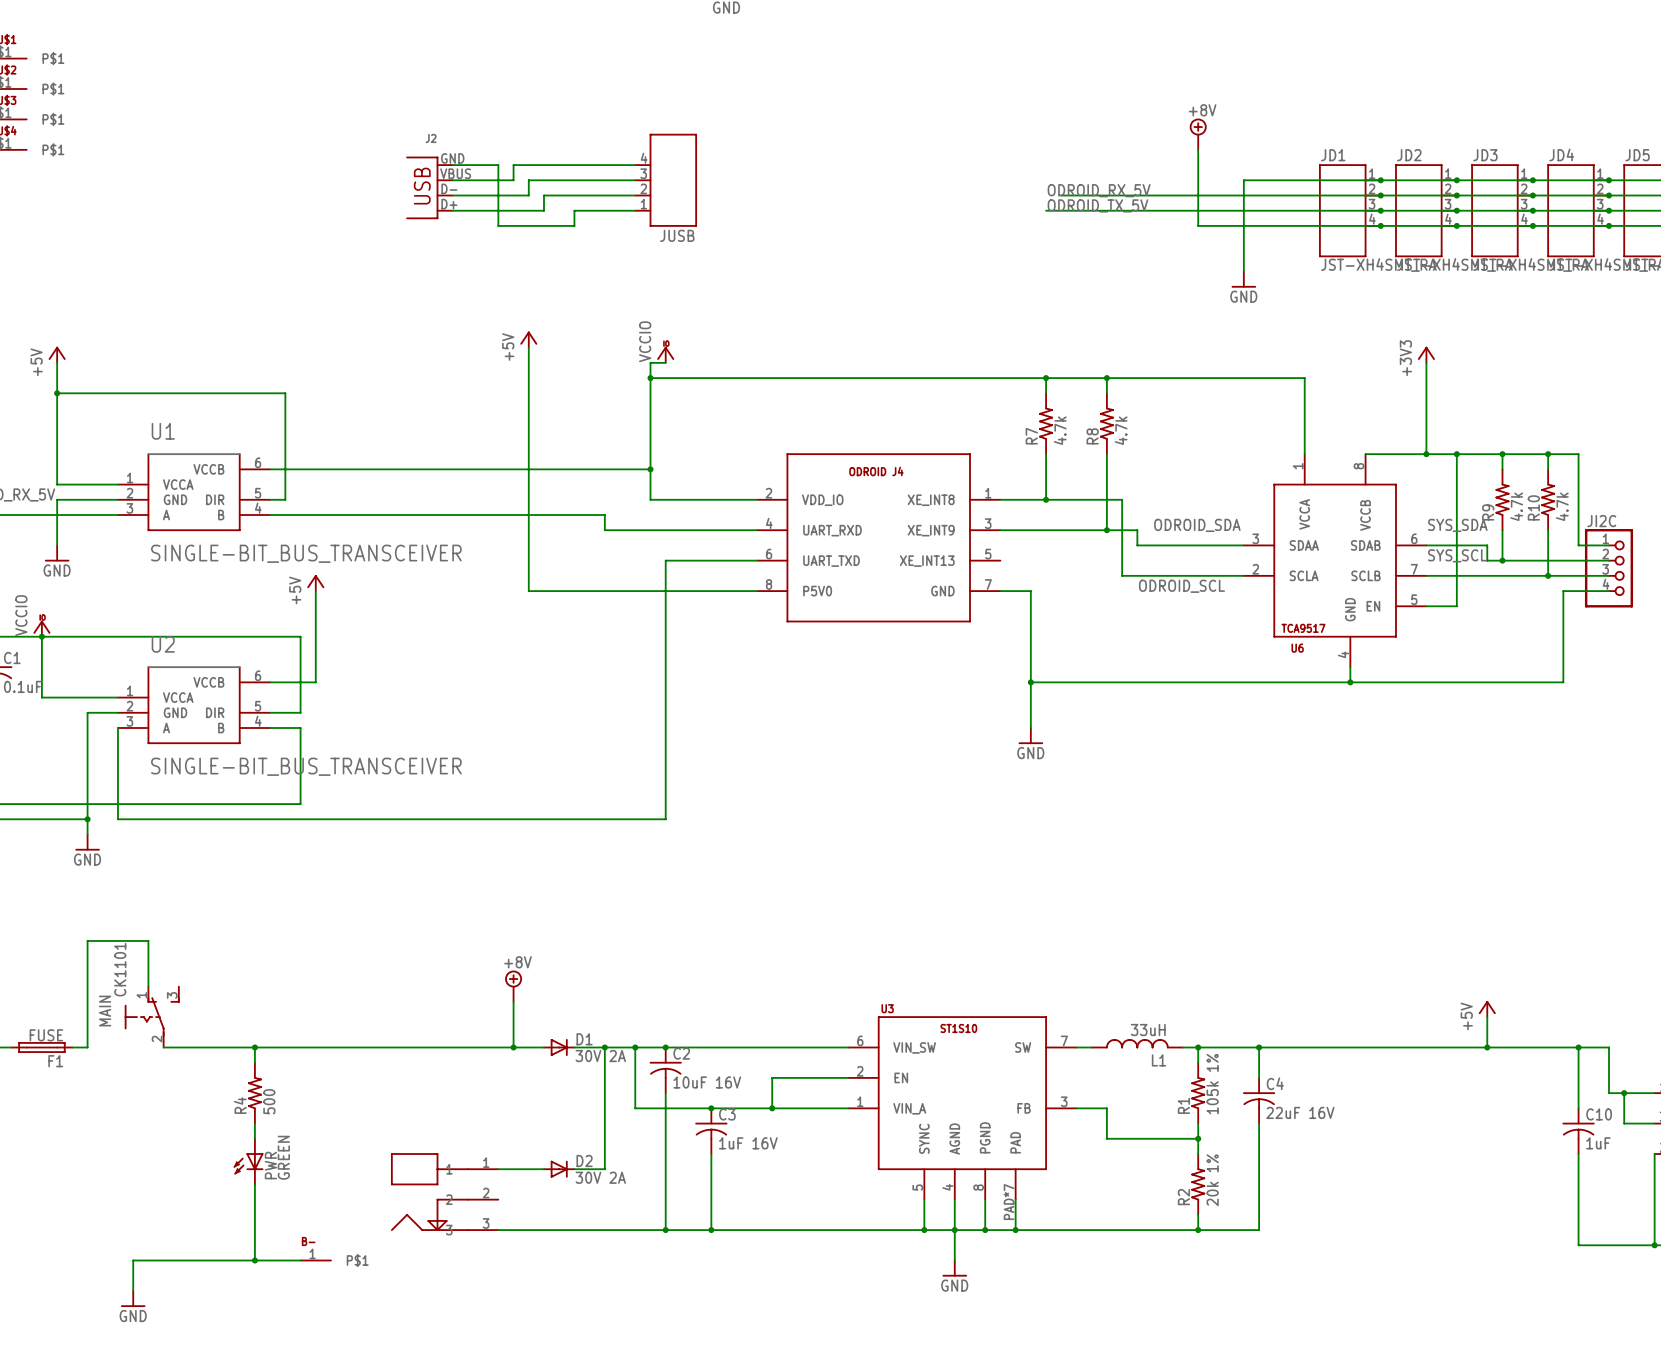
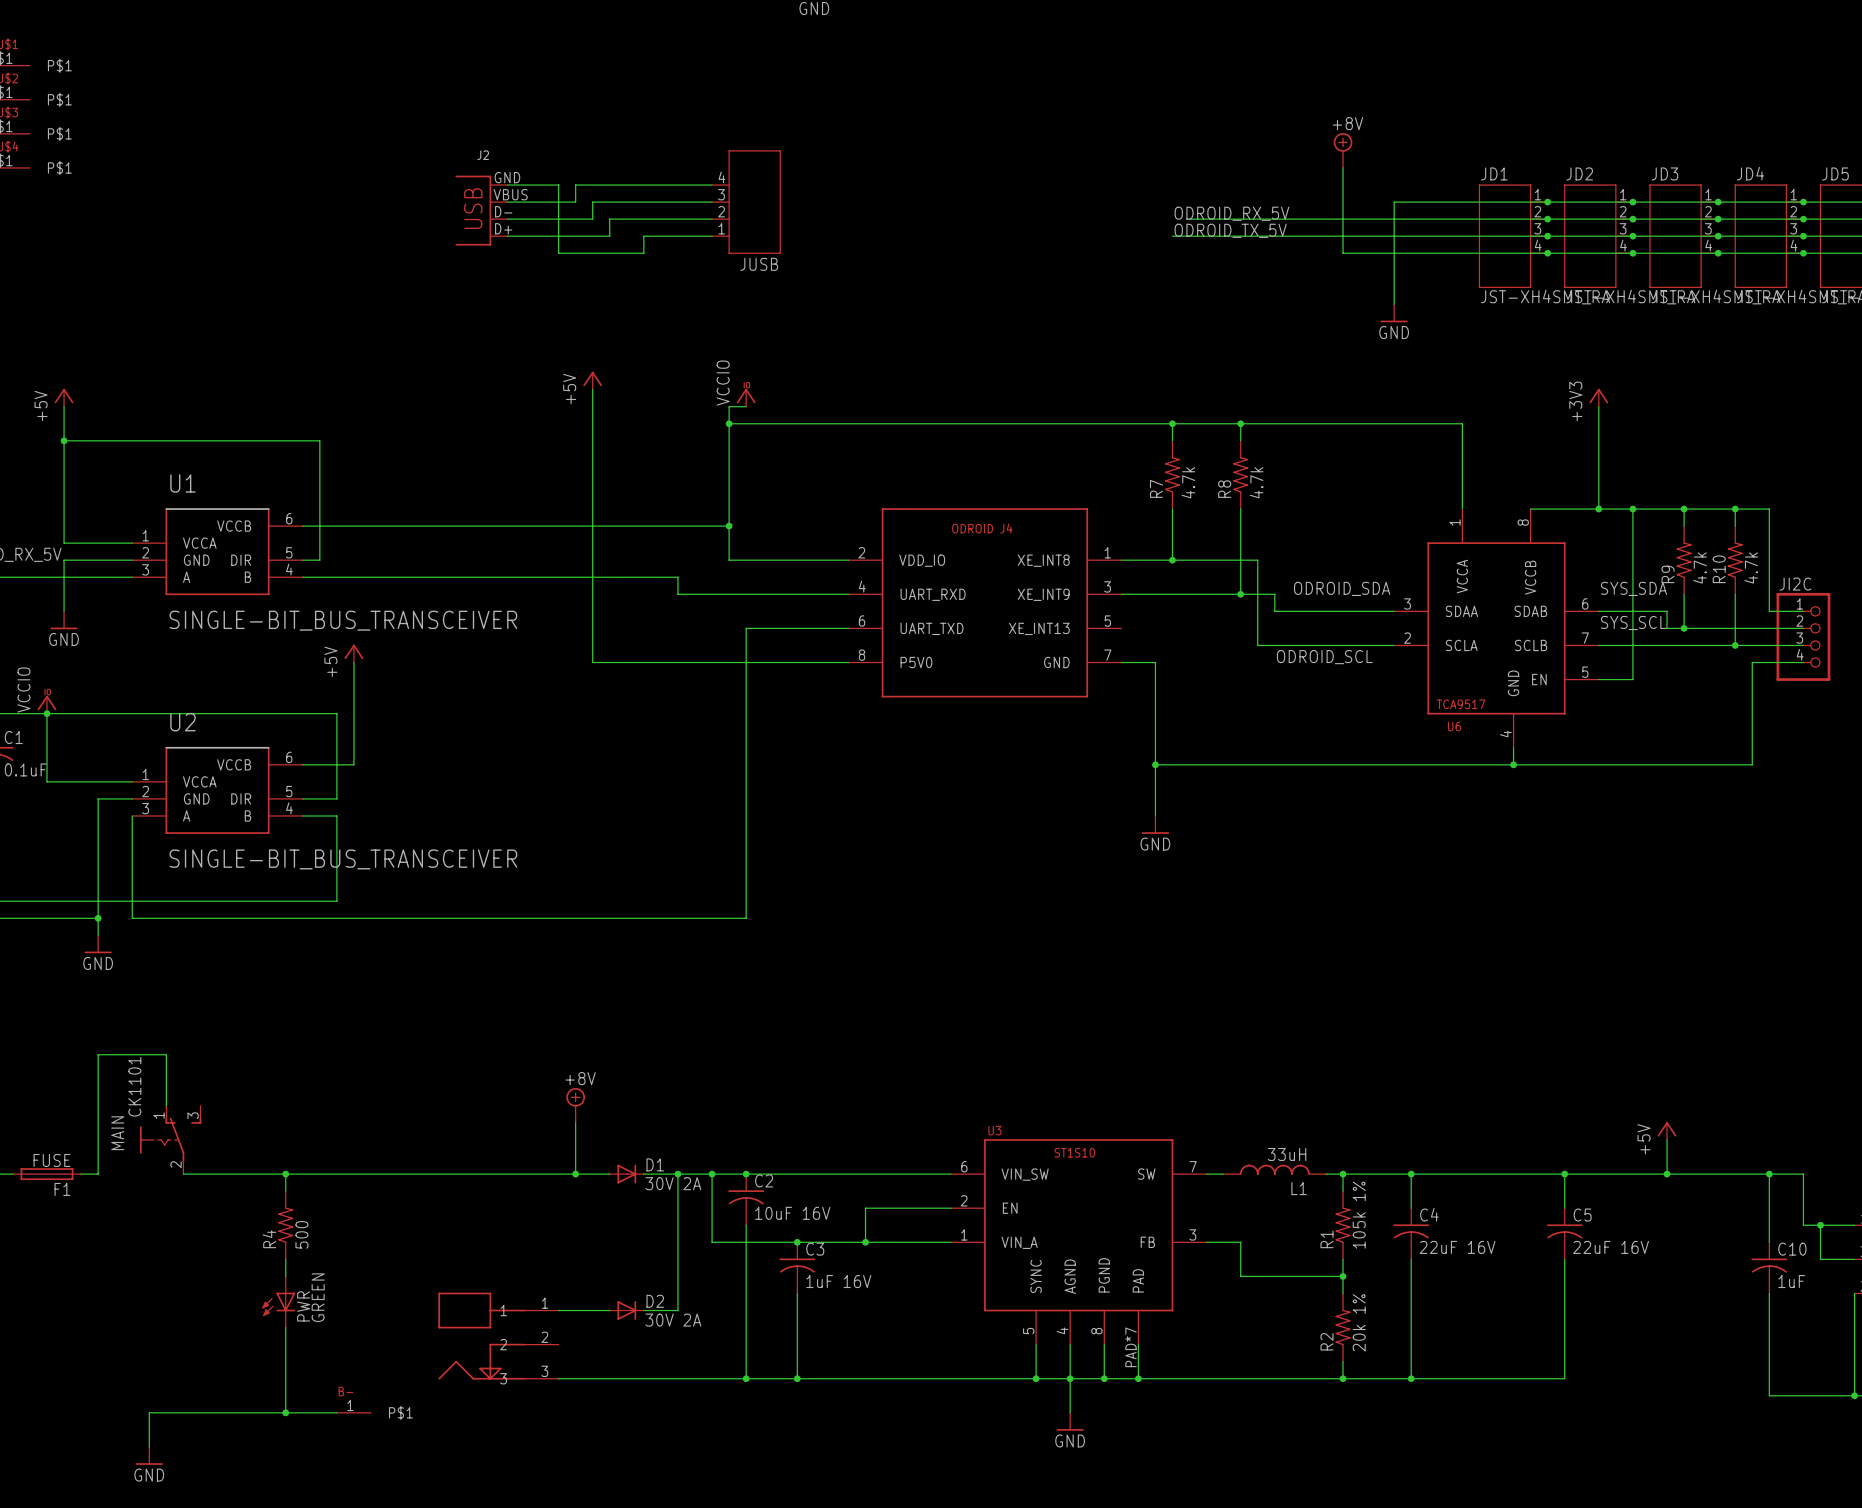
wire: none -> (1564, 1174) (1564, 1208)
junction: none -> (1564, 1174)
C5: none -> 22uF 16V (1564, 1233)
wire: none -> (1564, 1259) (1564, 1378) (1411, 1378)
junction: none -> (1411, 1378)

